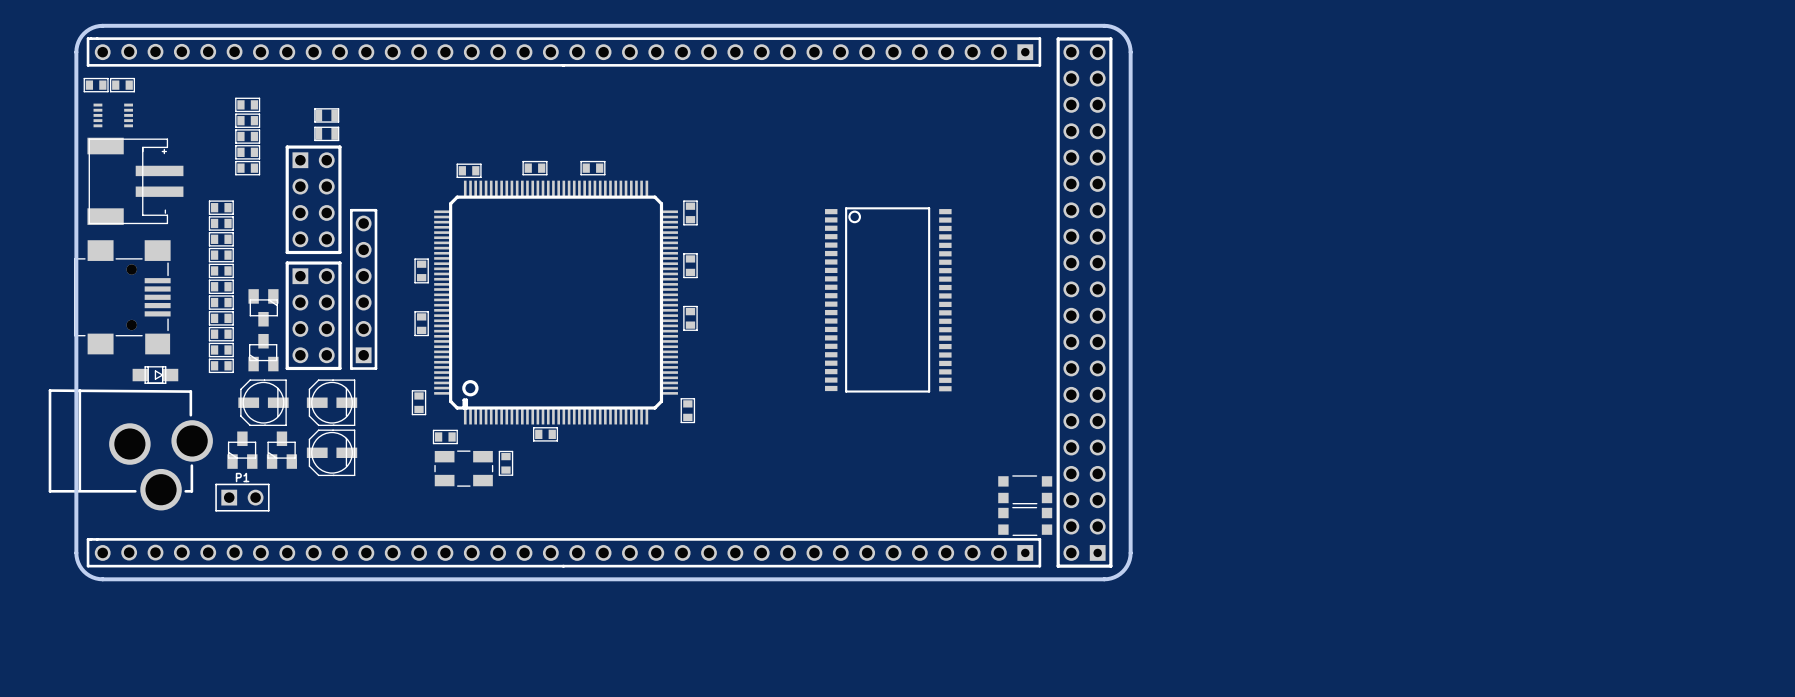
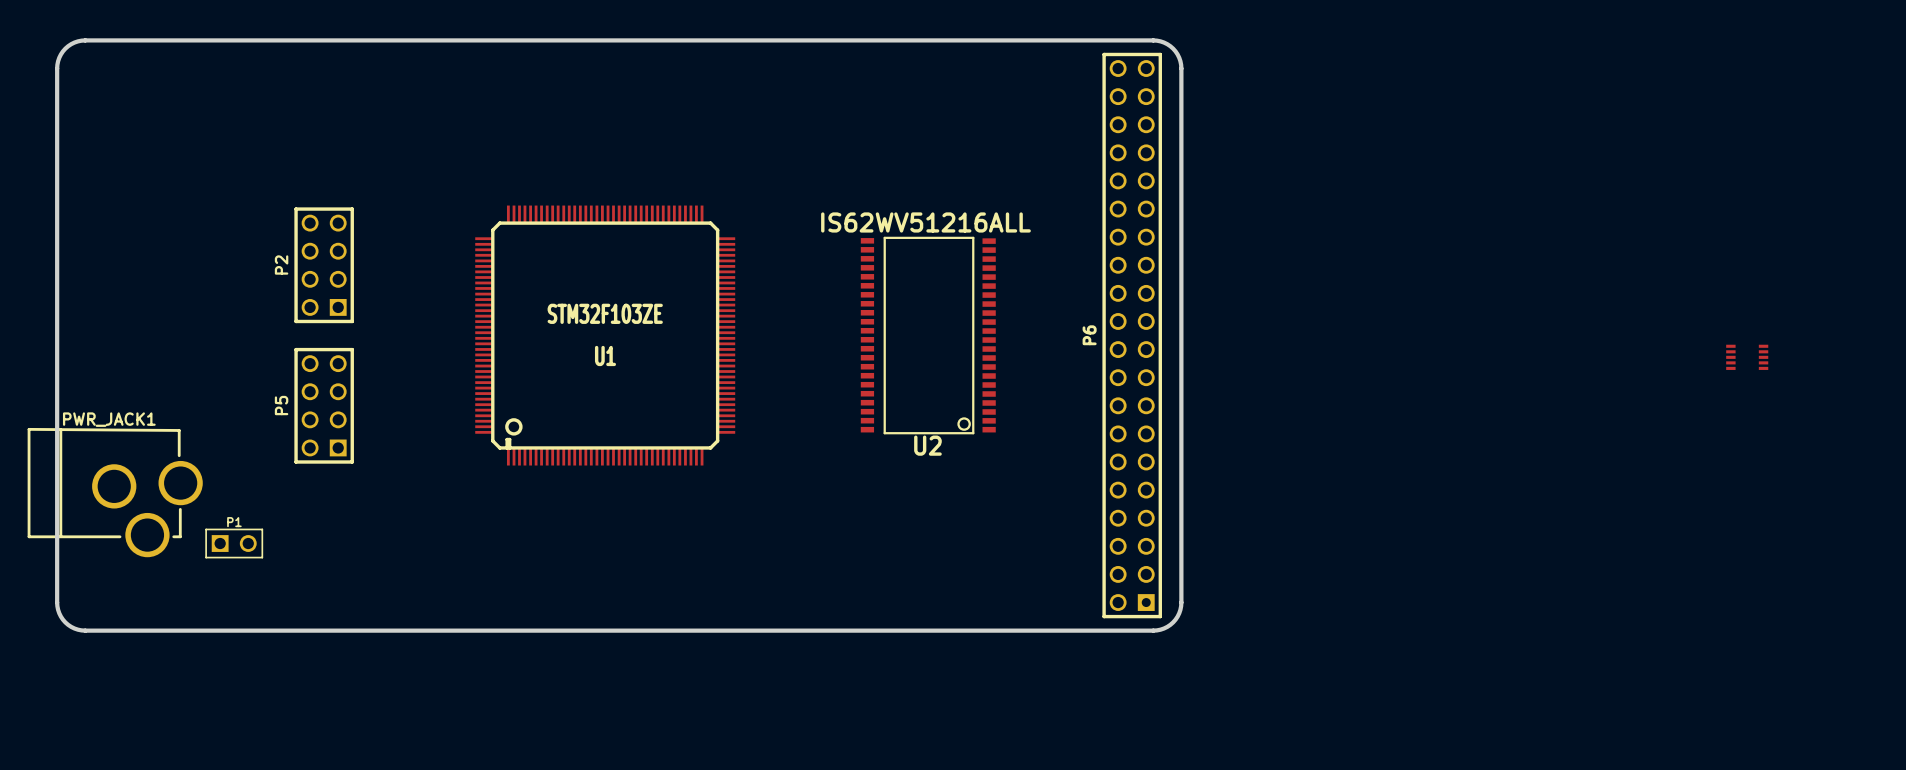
part: (563, 51) -> none
part: (96, 85) -> none
part: (122, 85) -> none
part: (247, 104) -> none
part: (113, 115) -> none
part: (326, 115) -> none
part: (247, 120) -> none
part: (326, 133) -> none
part: (247, 136) -> none
part: (247, 152) -> none
part: (247, 168) -> none
part: (534, 168) -> none
part: (592, 168) -> none
part: (469, 170) -> none
part: (135, 181) -> none
part: (313, 199) -> none
part: (221, 207) -> none
part: (690, 212) -> none
part: (221, 223) -> none
P2: none -> (324, 265)
part: (221, 239) -> none
part: (221, 255) -> none
part: (690, 265) -> none
part: (221, 270) -> none
part: (421, 270) -> none
part: (221, 286) -> none
part: (363, 289) -> none
part: (122, 297) -> none
part: (888, 299) -> none
part: (221, 302) -> none
part: (556, 302) -> none
U1: none -> STM32F103ZE (605, 335)
U2: none -> IS62WV51216ALL (928, 335)
P6 name: none -> P6 (1089, 335)
part: (263, 307) -> none
part: (313, 315) -> none
part: (221, 318) -> none
part: (690, 318) -> none
part: (421, 323) -> none
part: none -> (1747, 357)
part: (221, 334) -> none
part: (221, 350) -> none
part: (263, 352) -> none
part: (221, 365) -> none
P5: none -> (324, 405)
part: (155, 375) -> none
PWR_JACK1 name: none -> PWR_JACK1 (109, 419)
part: (263, 402) -> none
part: (332, 402) -> none
part: (419, 402) -> none
part: (687, 410) -> none
part: (545, 434) -> none
part: (445, 436) -> none
part: (242, 450) -> none
part: (281, 450) -> none
part: (332, 452) -> none
part: (505, 463) -> none
part: (463, 468) -> none
part: (1025, 489) -> none
part: (1025, 521) -> none
part: (563, 552) -> none

